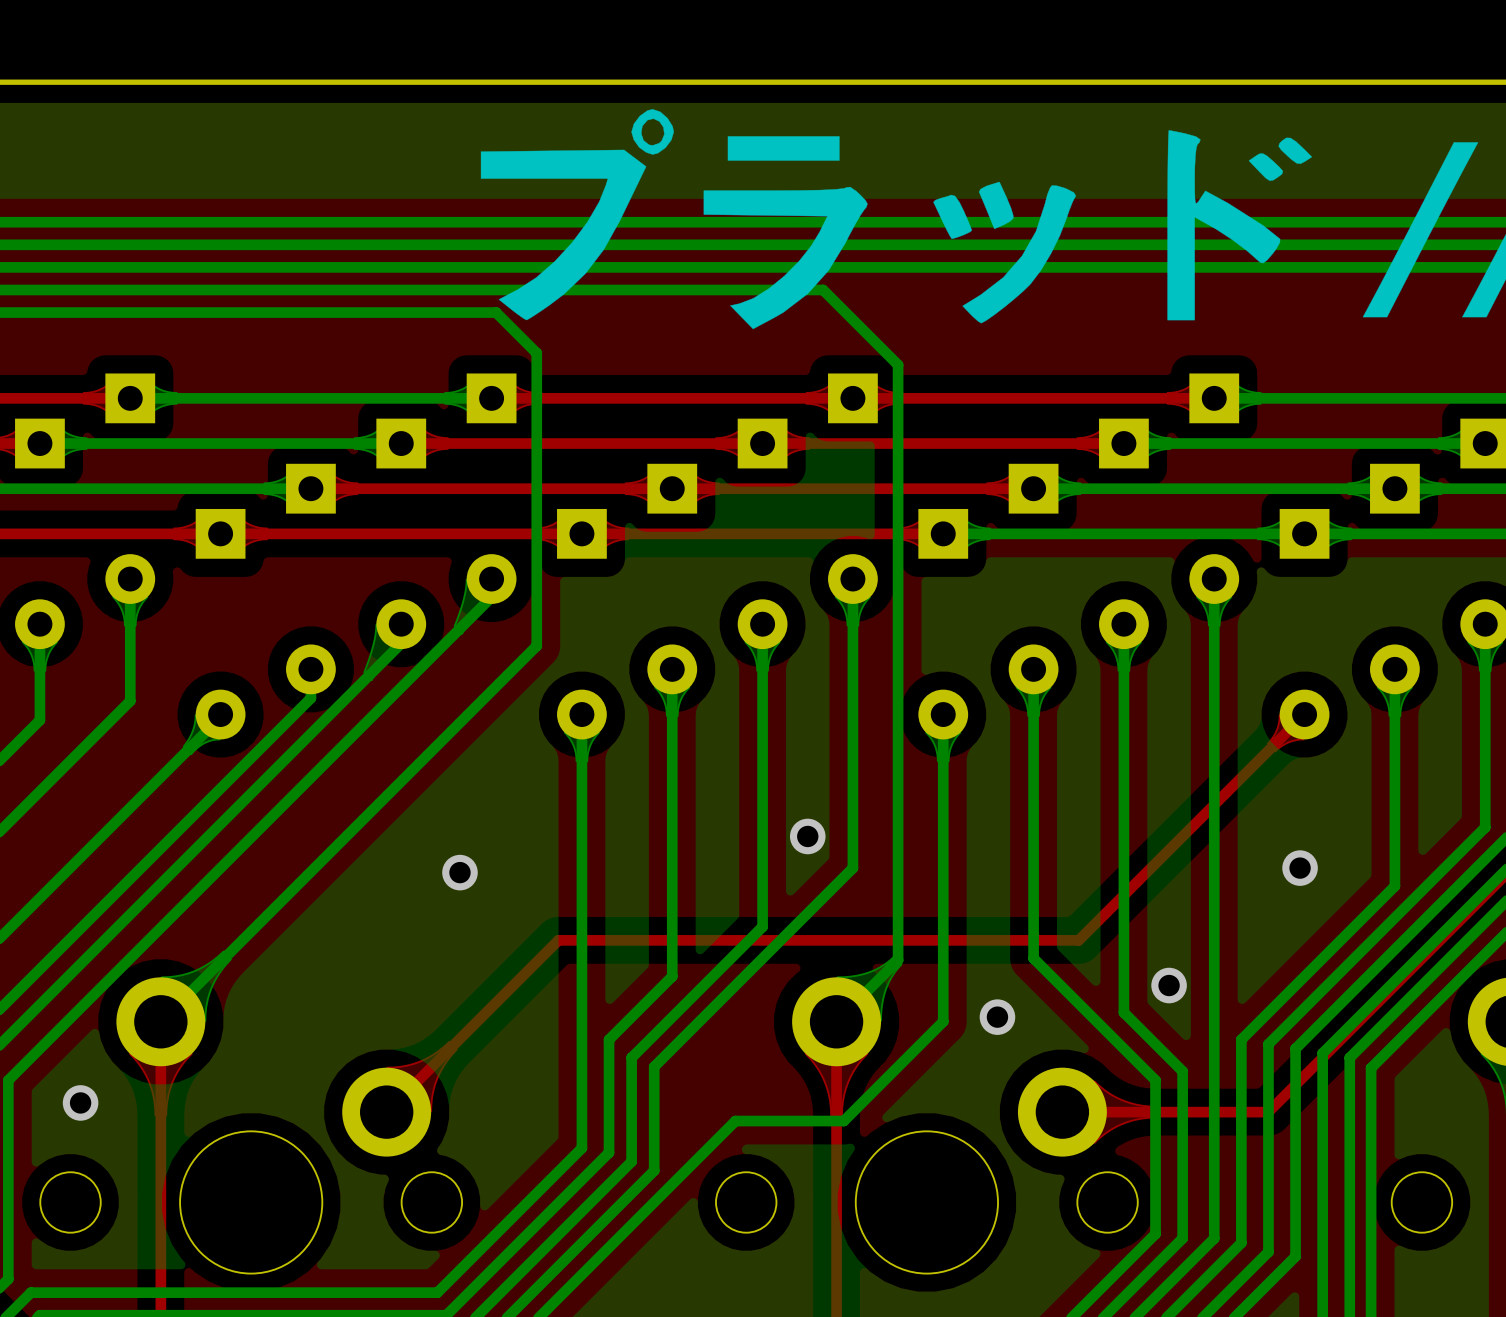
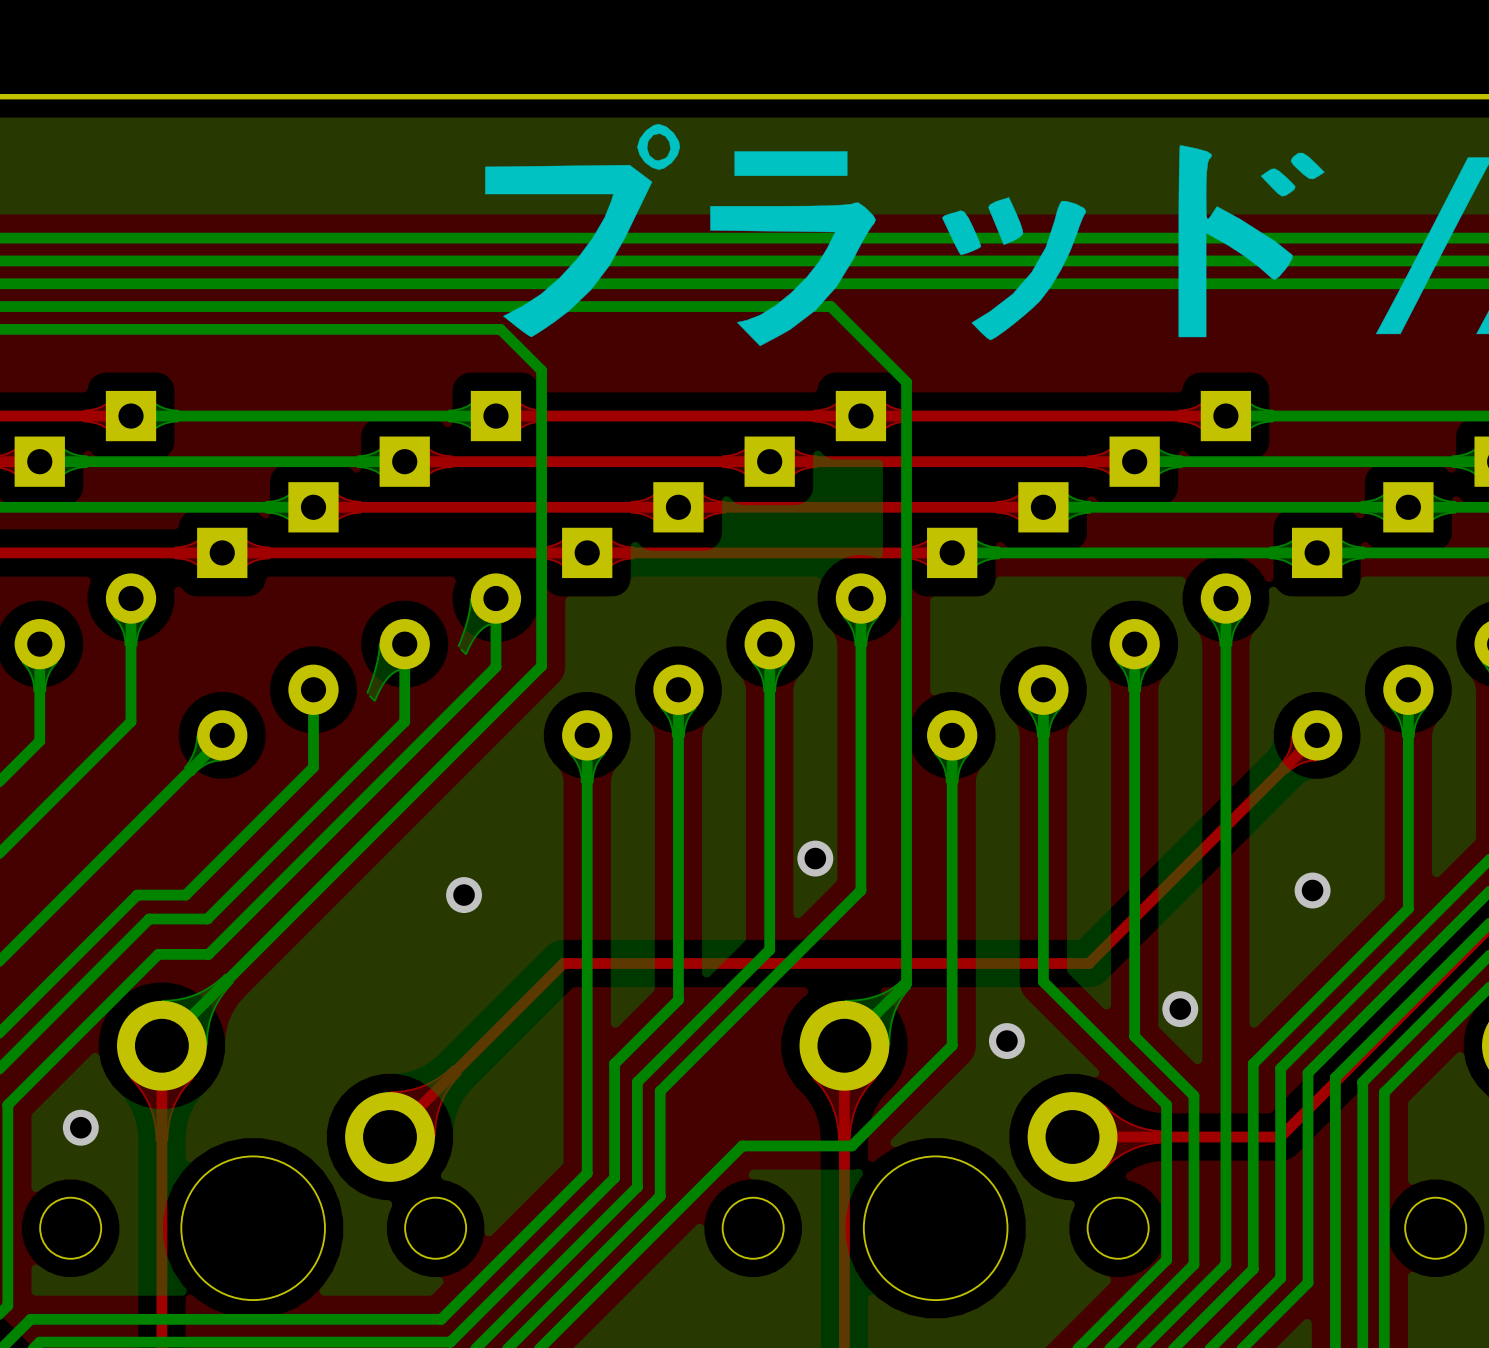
bottom track: (491, 597) (157, 931) -> (495, 616) (495, 666) (208, 954) (158, 954)
bottom track: (401, 643) (148, 896) -> (404, 663) (404, 721) (207, 919) (149, 919)
bottom track: (310, 698) (136, 872) -> (313, 718) (313, 767) (185, 895) (137, 895)

